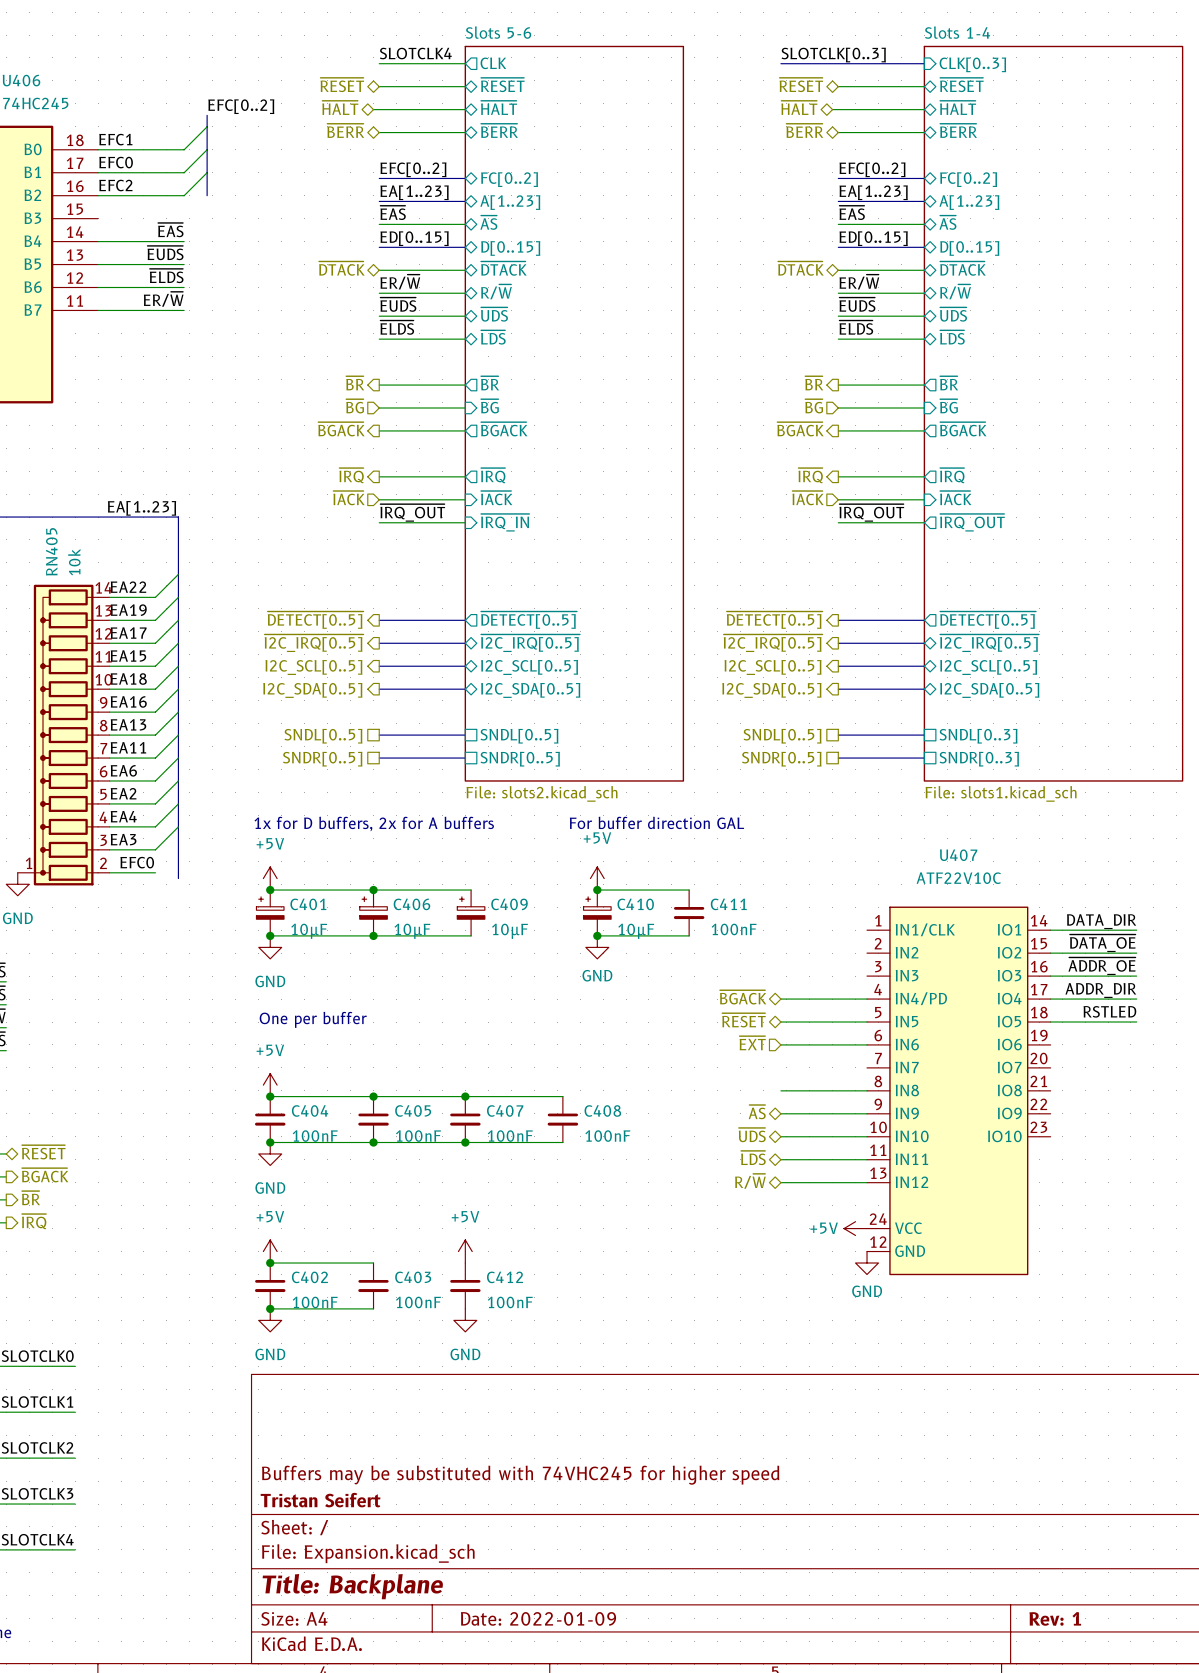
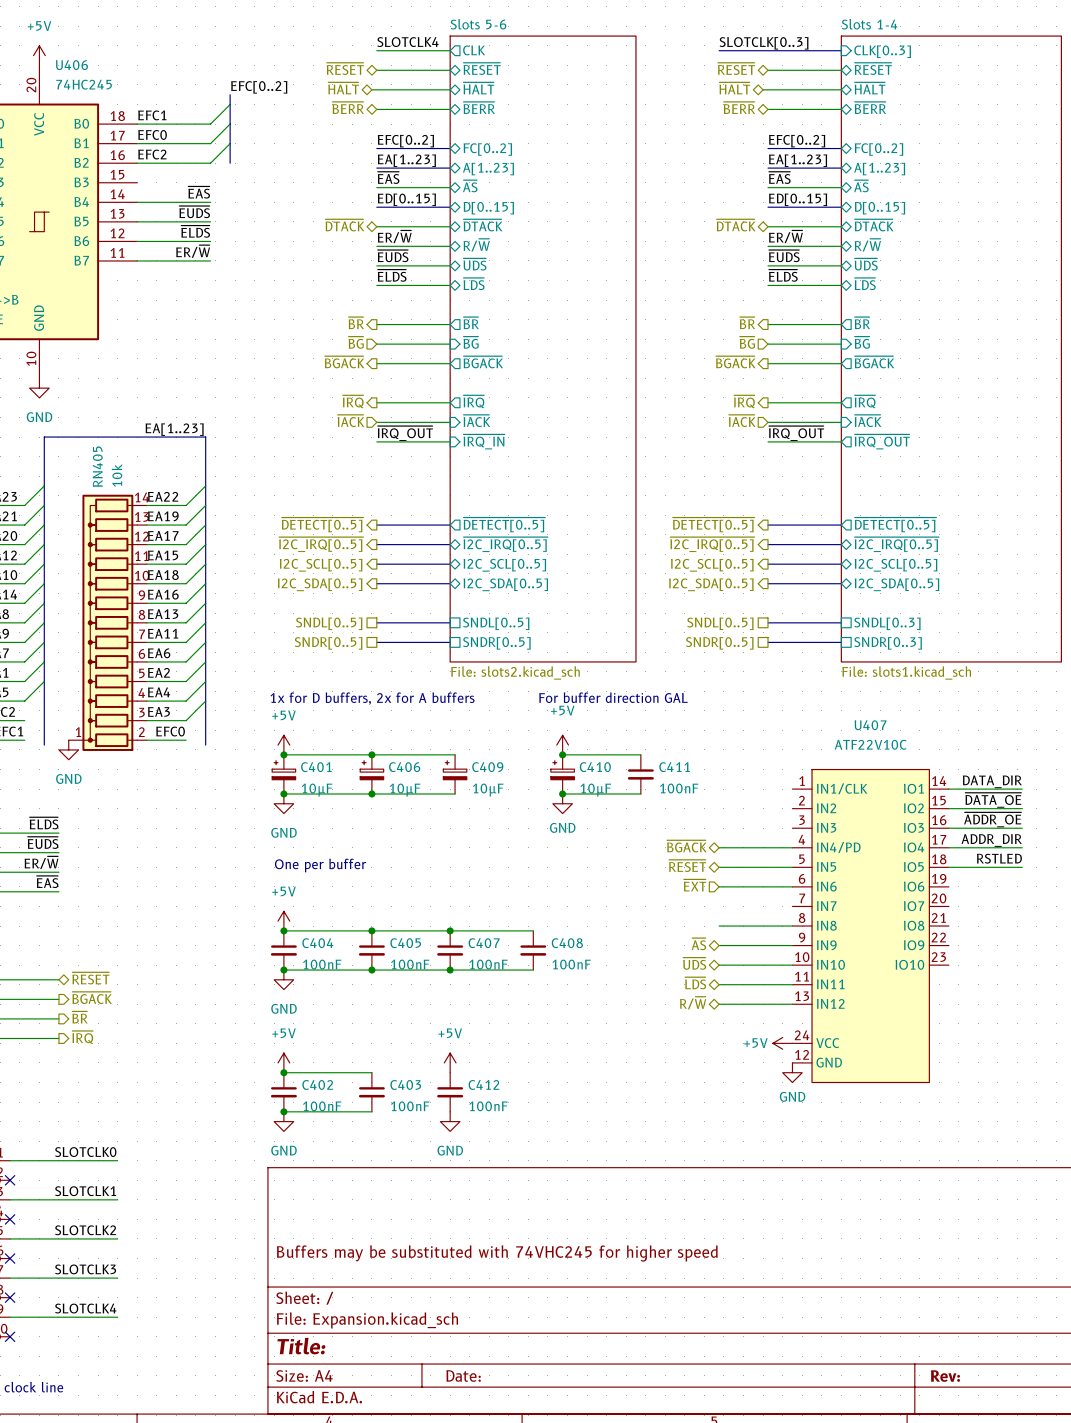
title block: Tristan Seifert (320, 1500) -> none
title block: Title: Backplane (352, 1586) -> Title: (301, 1346)
title block: Date: 2022-01-09 (538, 1618) -> Date: (463, 1376)
title block: Rev: 1 (1055, 1618) -> Rev: (945, 1376)

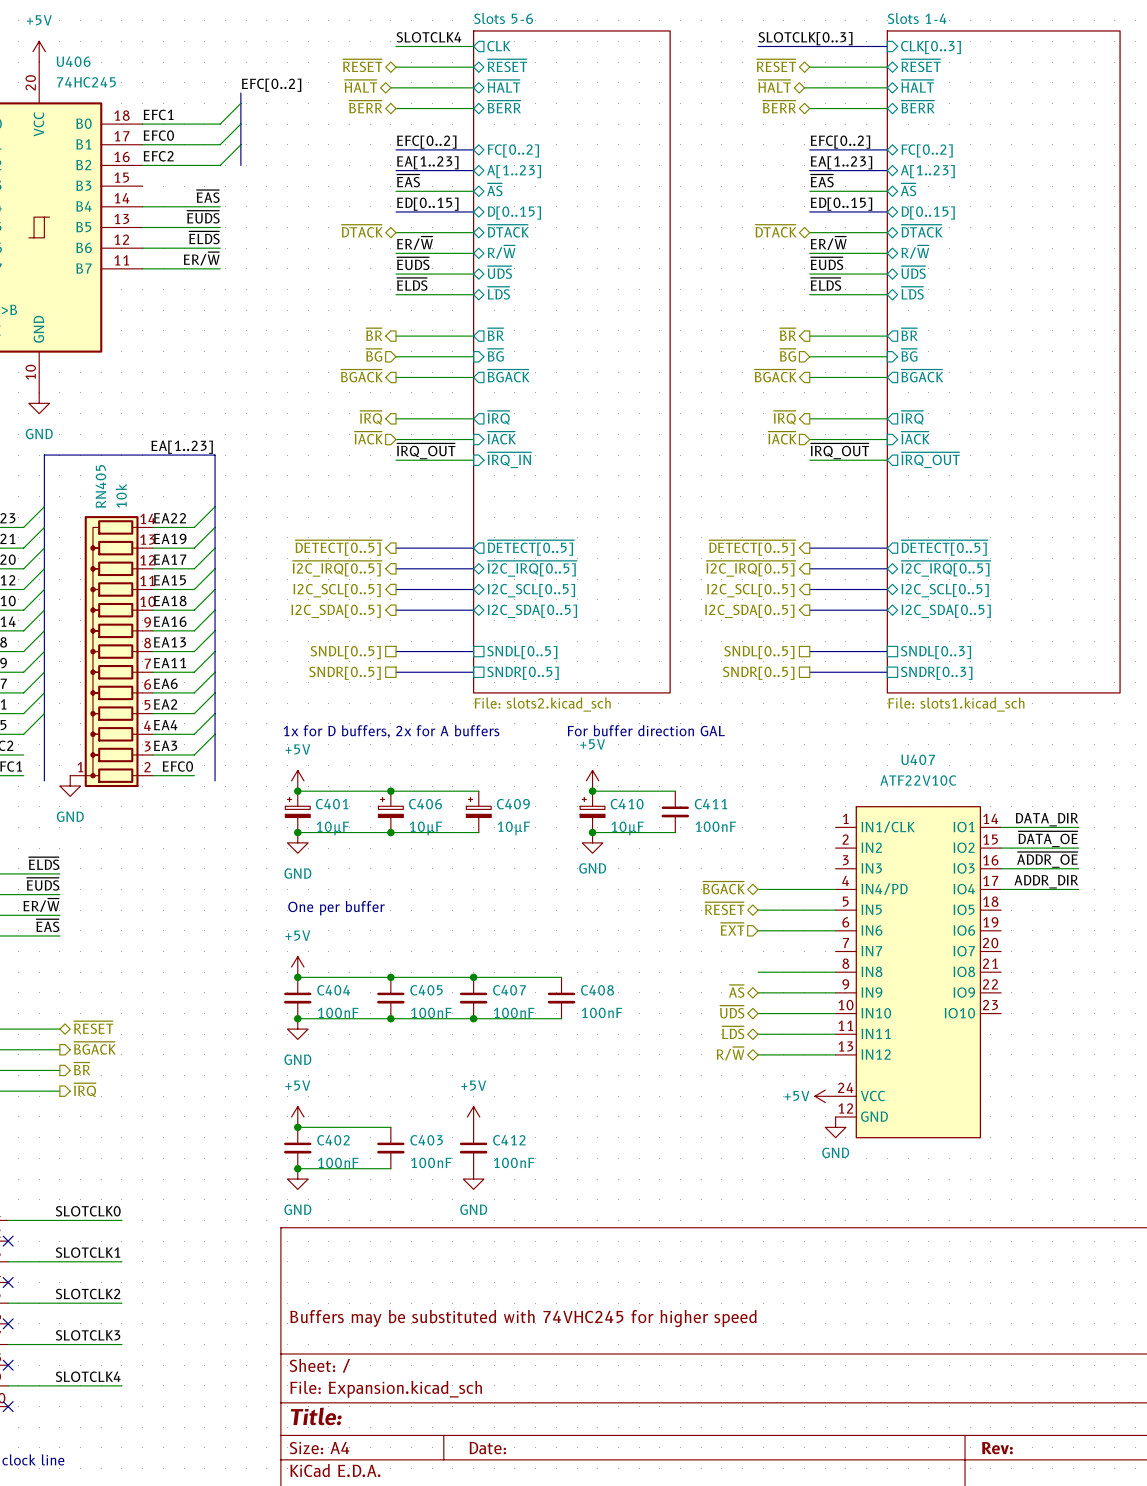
label: RSTLED (999, 858) -> none
wire: (948, 867) (1022, 867) -> none

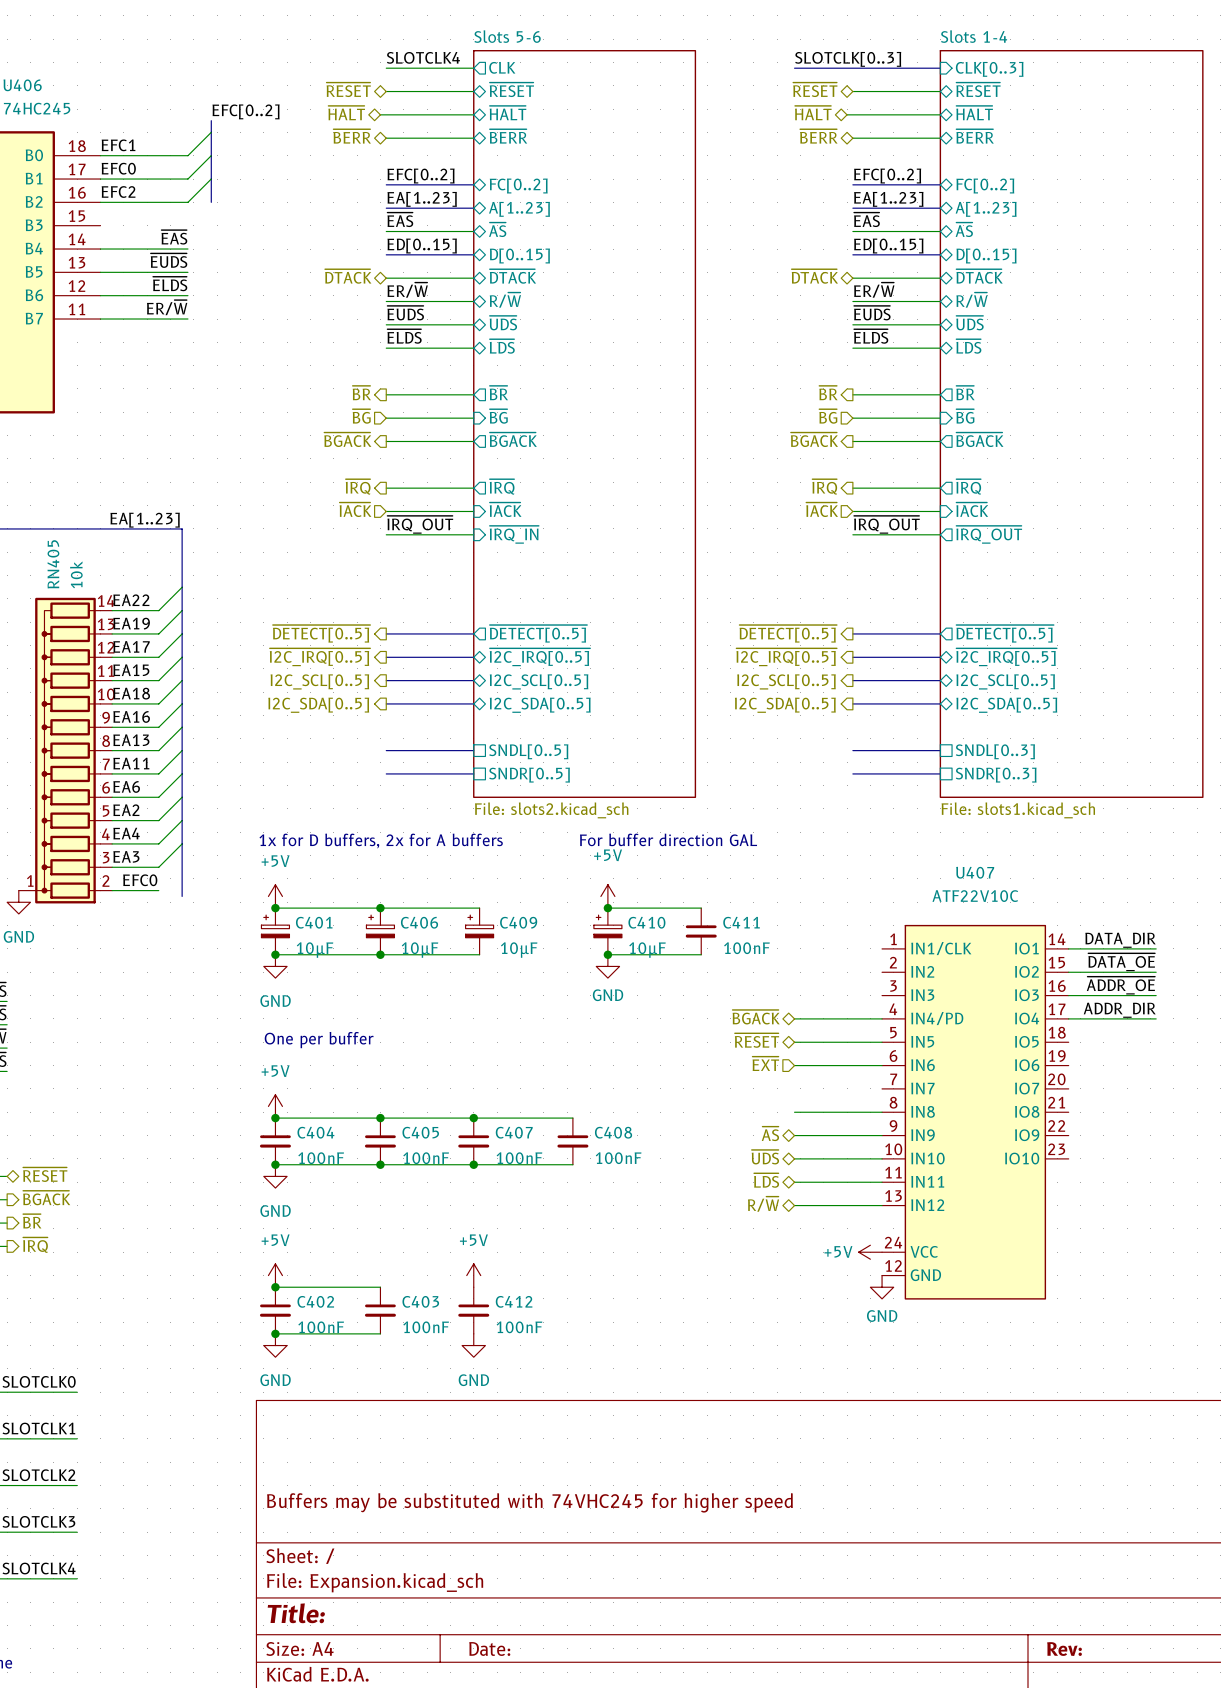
hierarchical label: SNDL[0..5] (345, 652) -> none
hierarchical label: SNDL[0..5] (759, 652) -> none
hierarchical label: SNDR[0..5] (345, 673) -> none
hierarchical label: SNDR[0..5] (758, 673) -> none

